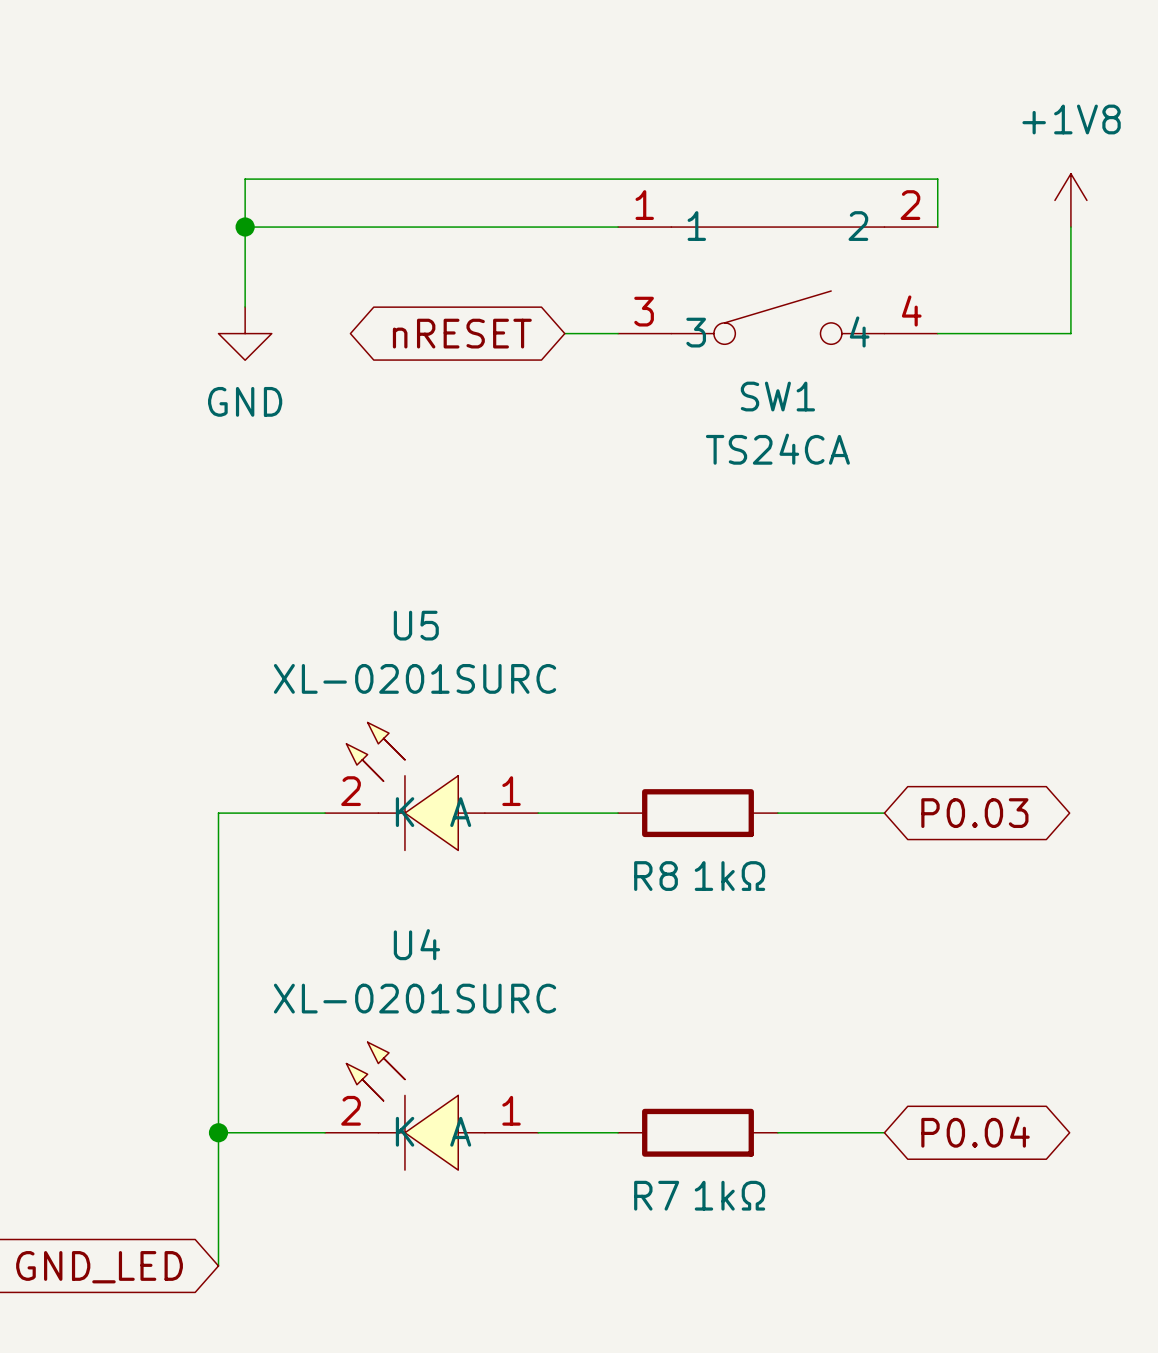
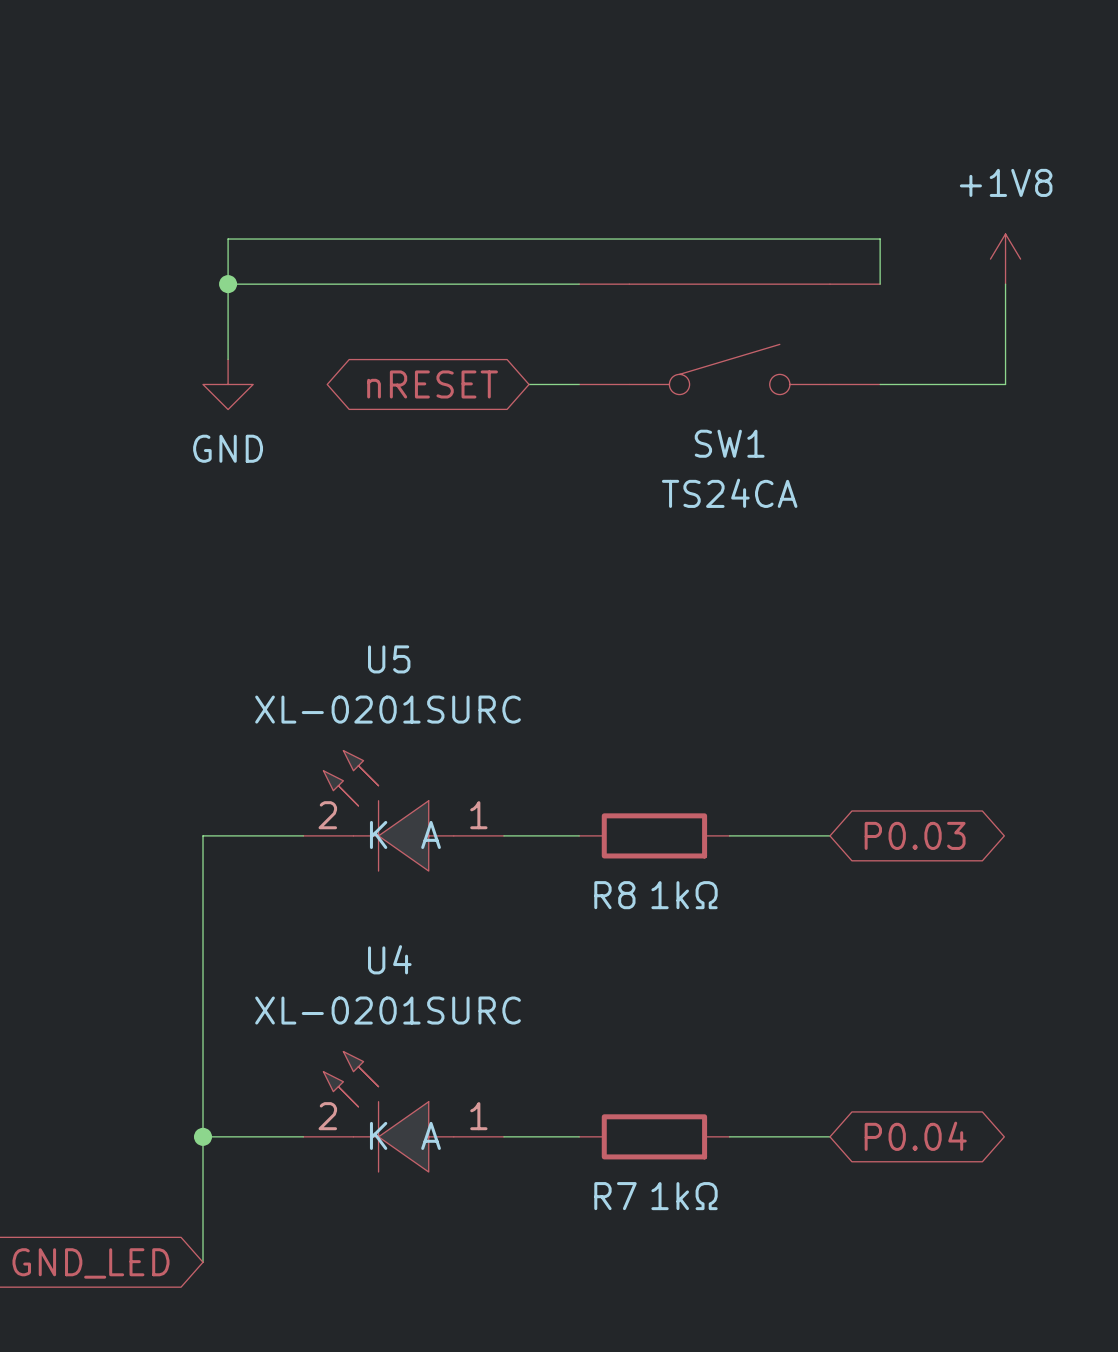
SW1 pin number: 1 (644, 205) -> none
SW1 pin number: 2 (910, 205) -> none
SW1 pin name: 1 (696, 226) -> none
SW1 pin name: 2 (858, 226) -> none
SW1 pin number: 4 (911, 310) -> none
SW1 pin number: 3 (644, 311) -> none
SW1 pin name: 4 (859, 331) -> none
SW1 pin name: 3 (696, 332) -> none

